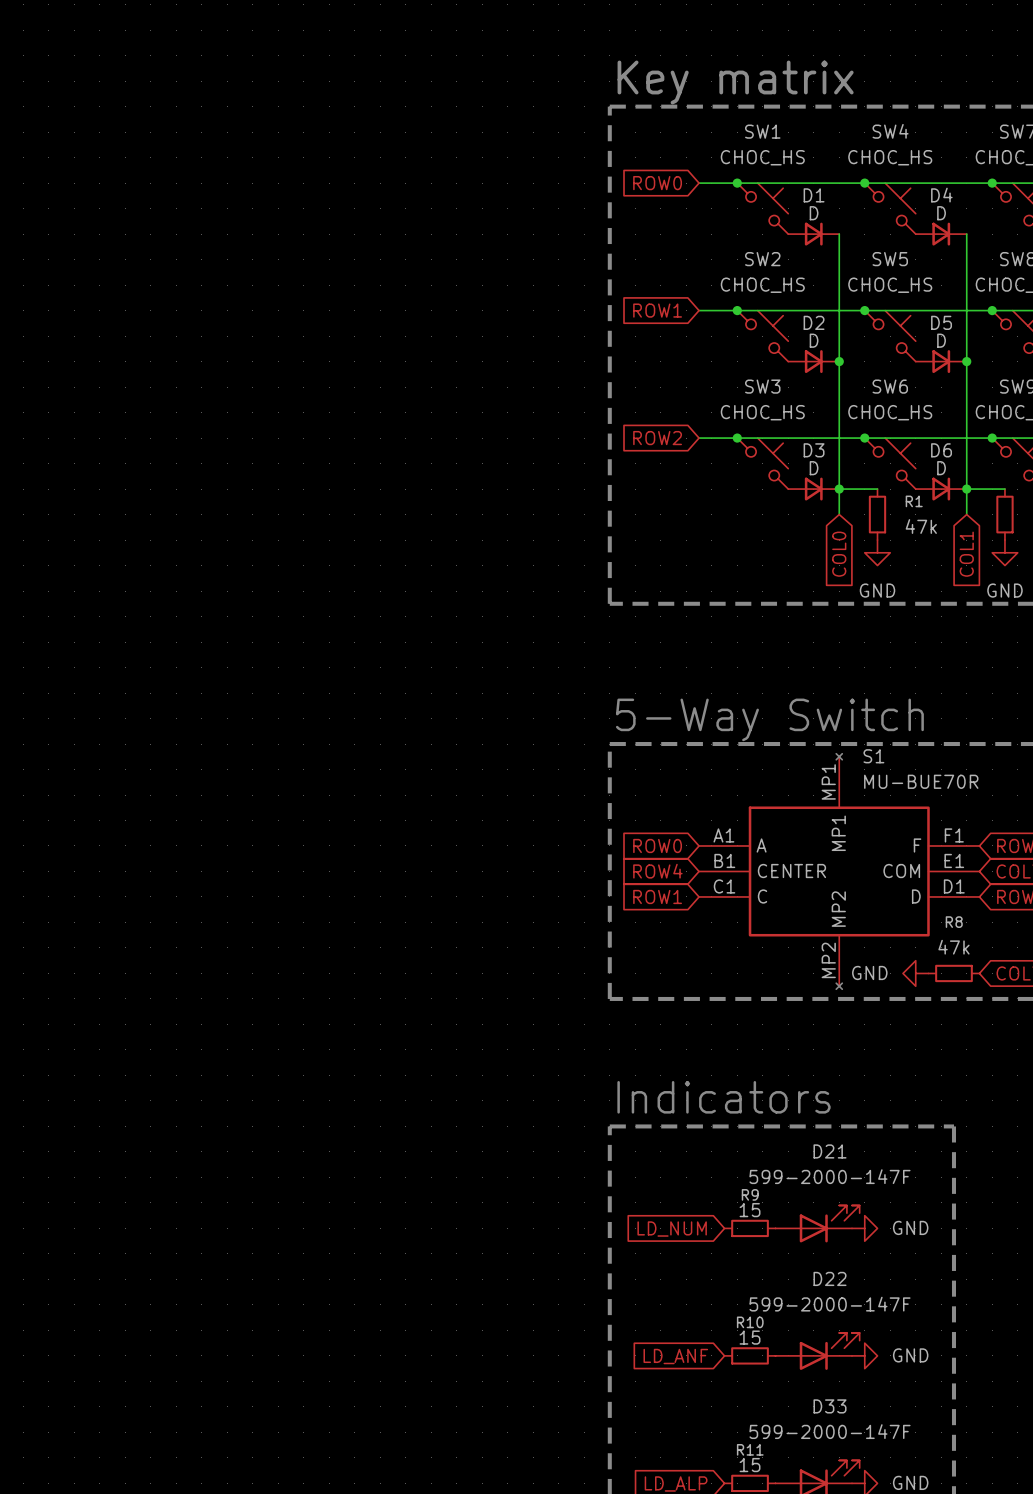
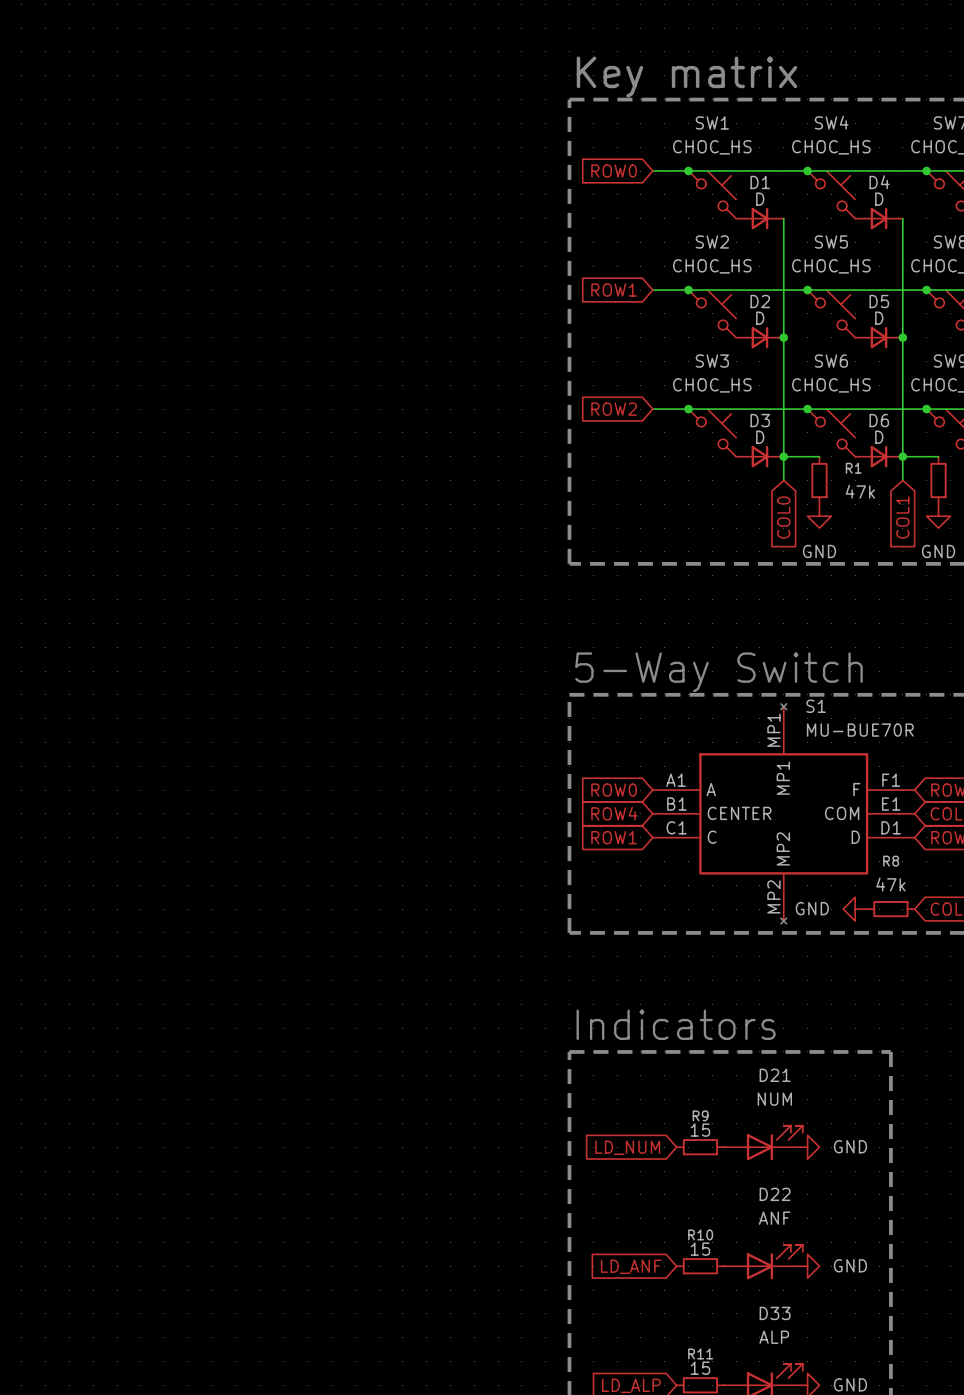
D21 value: 599-2000-147F (830, 1176) -> NUM (774, 1099)
D22 value: 599-2000-147F (830, 1304) -> ANF (774, 1218)
D33 value: 599-2000-147F (830, 1431) -> ALP (774, 1337)

